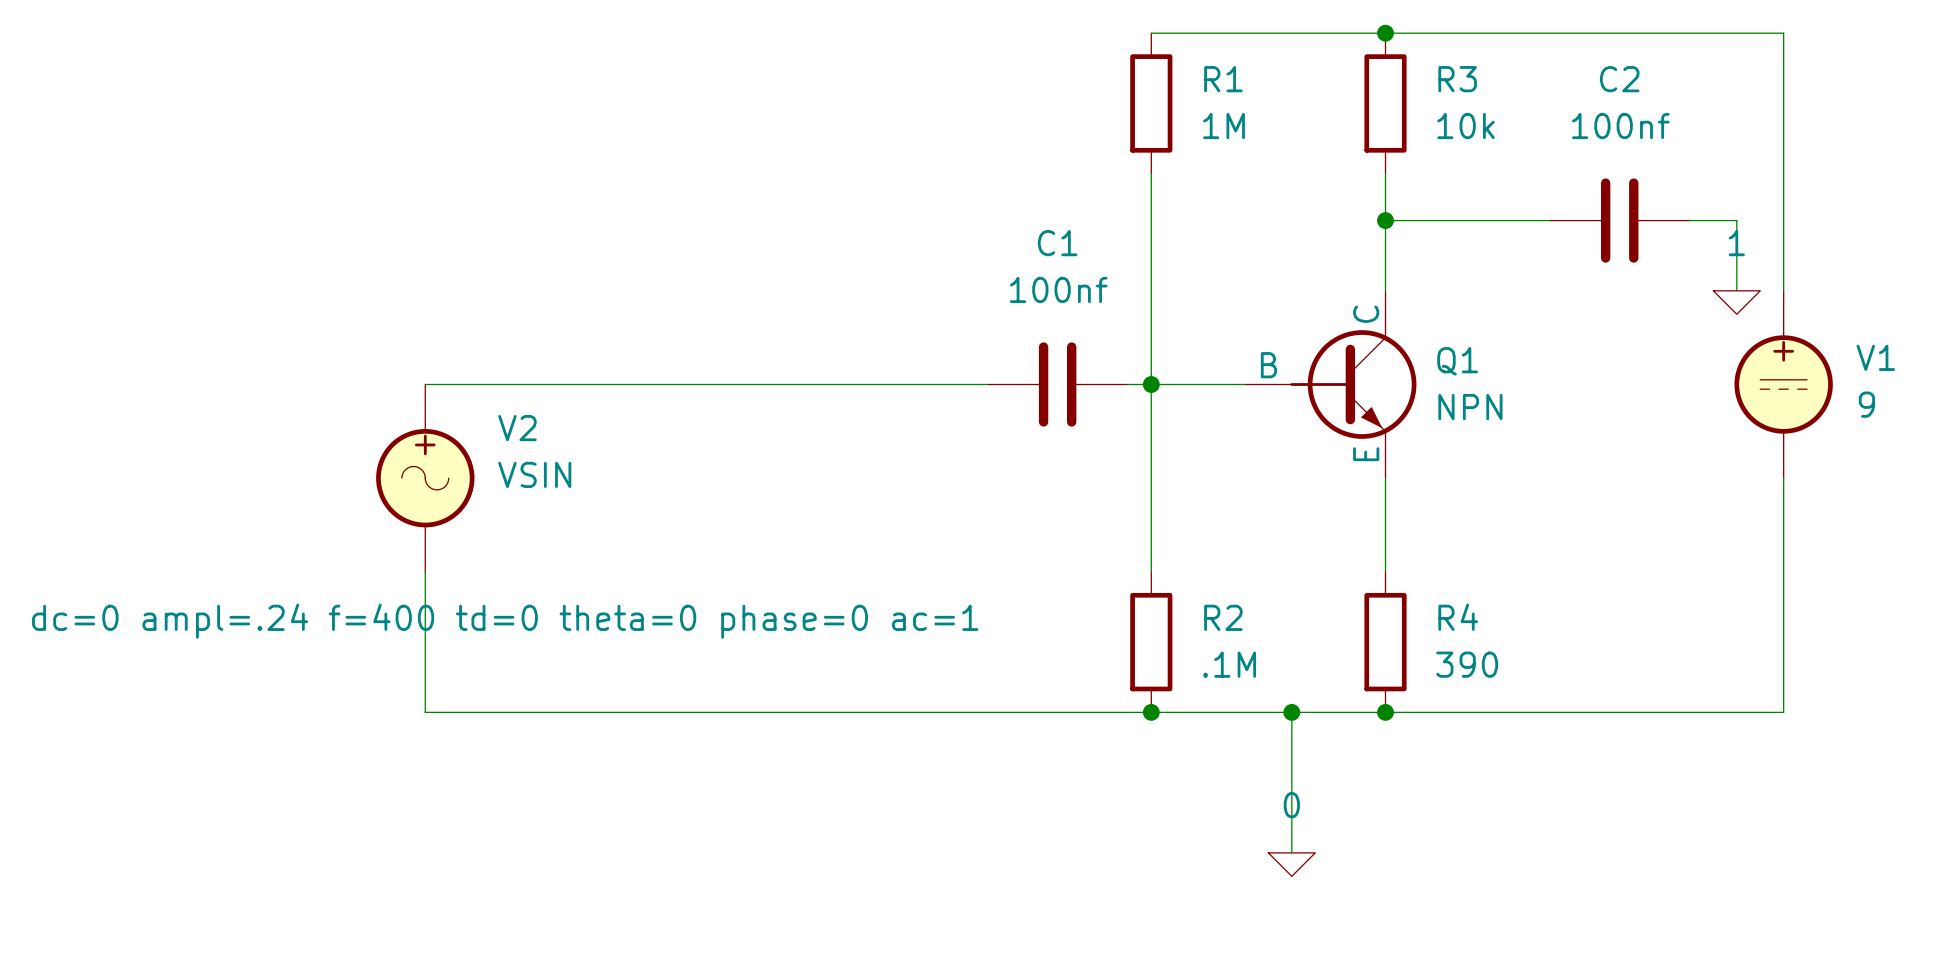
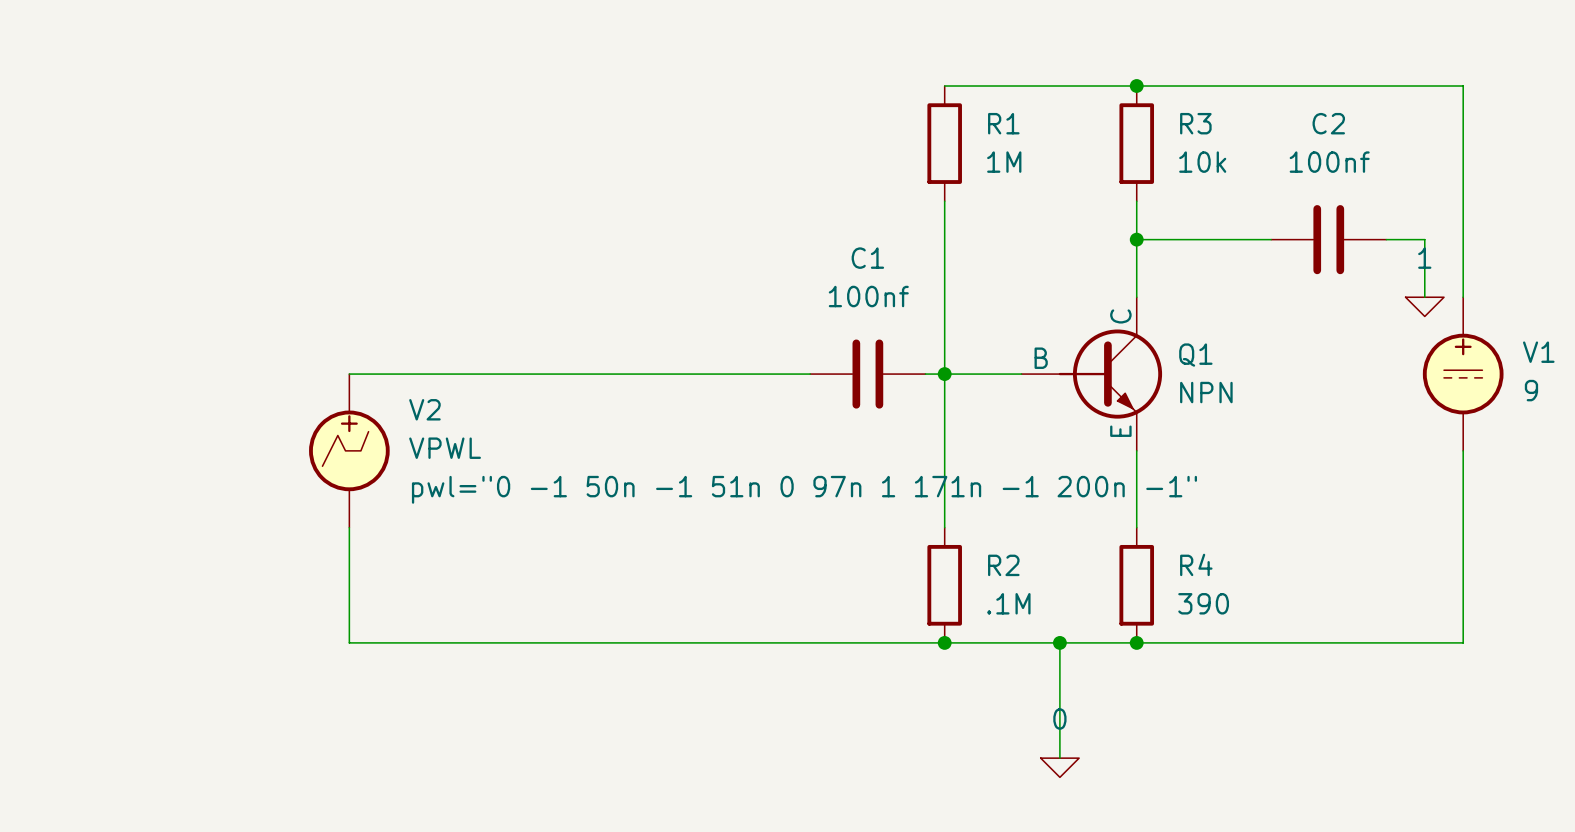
V2 symbol: [376, 384, 475, 572] -> [309, 374, 390, 528]
V2 value: VSIN (534, 474) -> VPWL (445, 448)
V2 text: dc=0 ampl=.24 f=400 td=0 theta=0 phase=0 ac=1 (505, 621) -> pwl="0 -1 50n -1 51n 0 97n 1 171n -1 200n -1" (804, 489)

